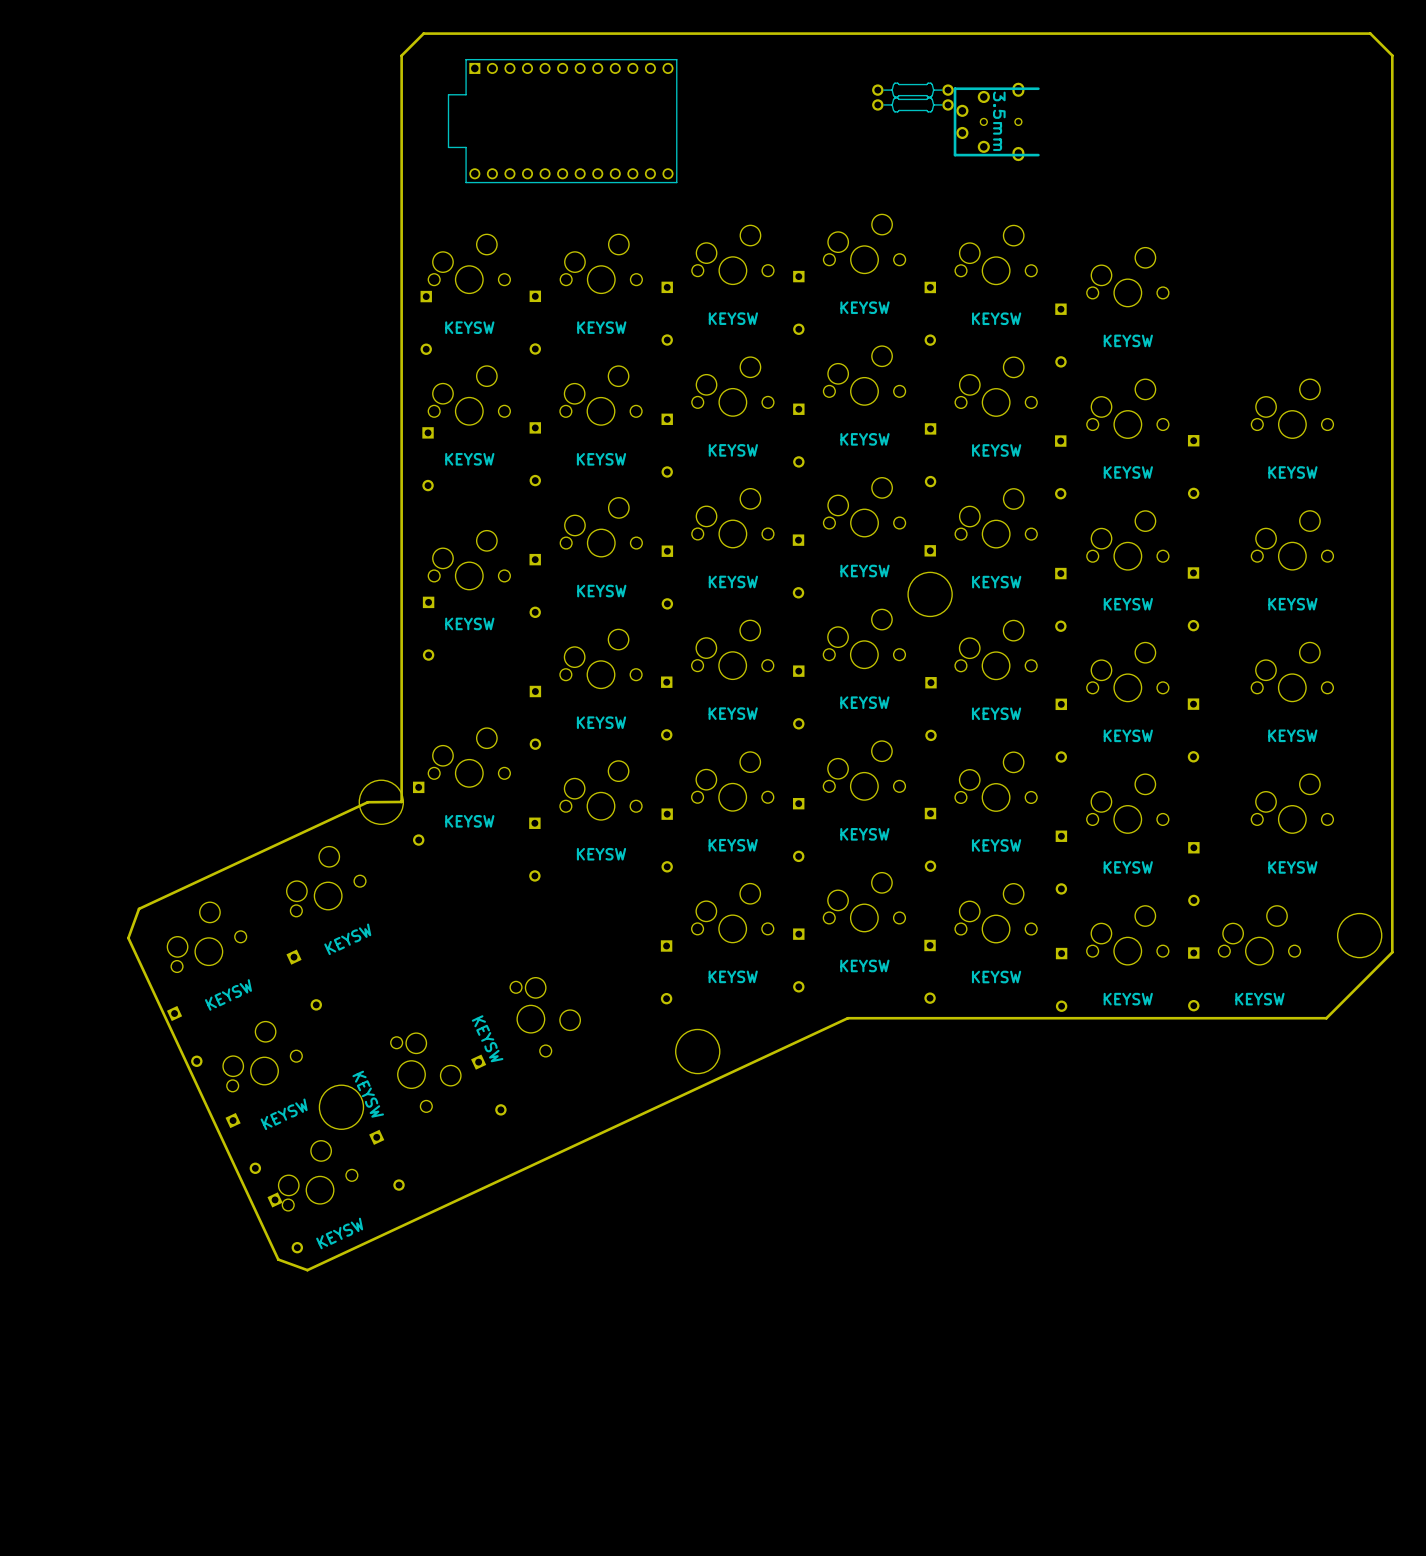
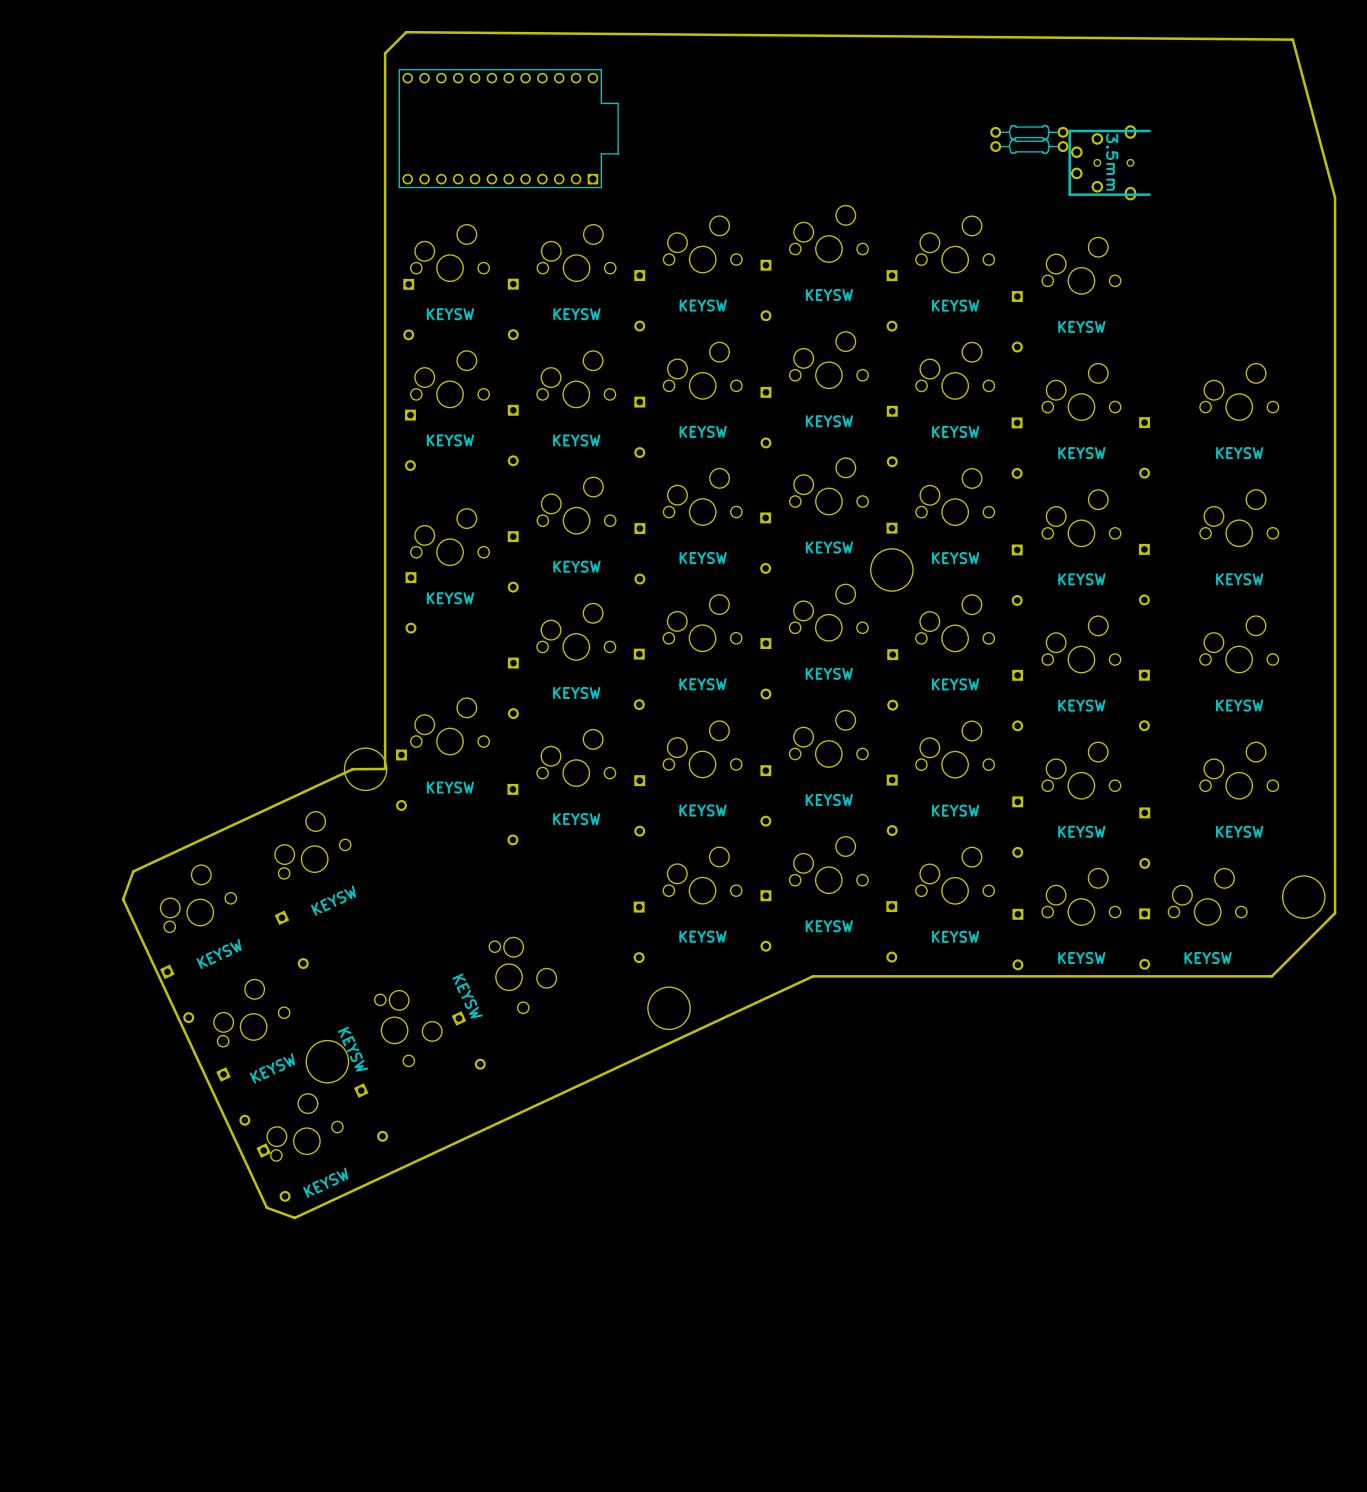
board edge: (423, 33) (1370, 33) (1392, 55) (1392, 206) -> (406, 32) (1292, 39)
board edge: none -> (1292, 39) (1335, 197)
part: (912, 90) -> none
part: (912, 104) -> none
part rotation: 0° (562, 121) -> 180° (508, 128)
part position: (996, 121) -> (1109, 162)
part: none -> (1029, 132)
part: none -> (1029, 146)

